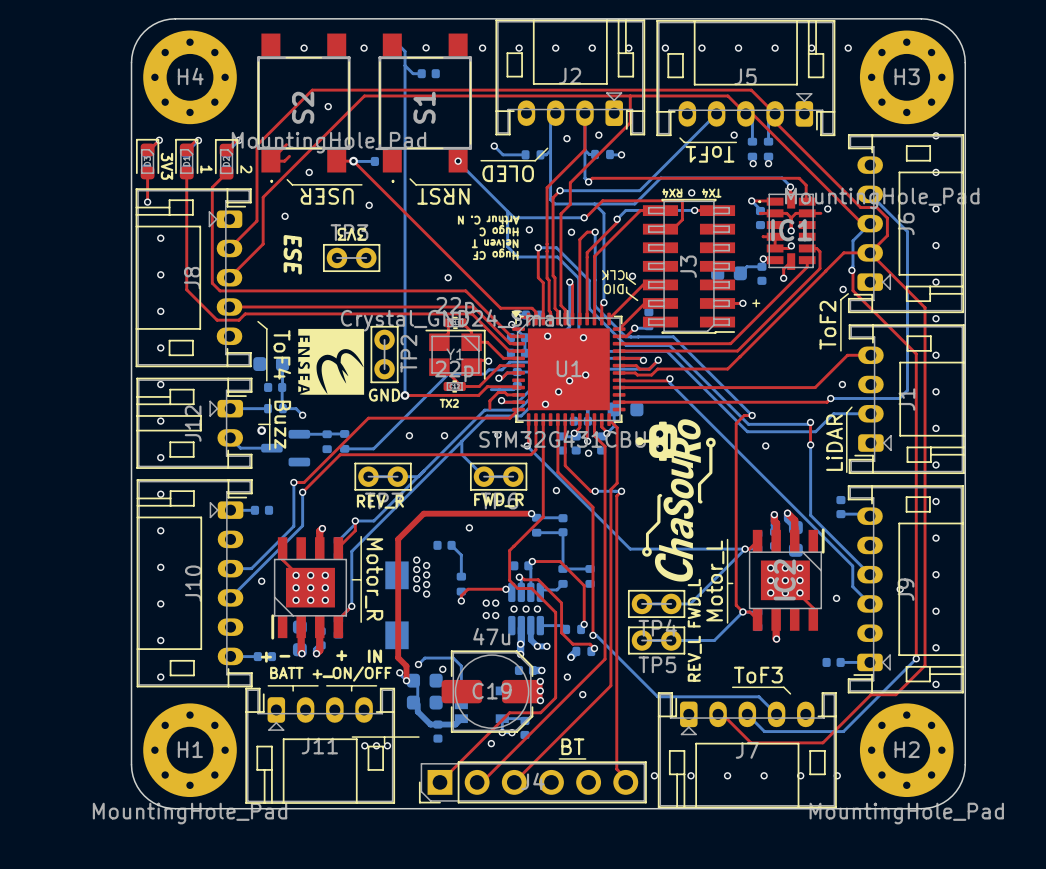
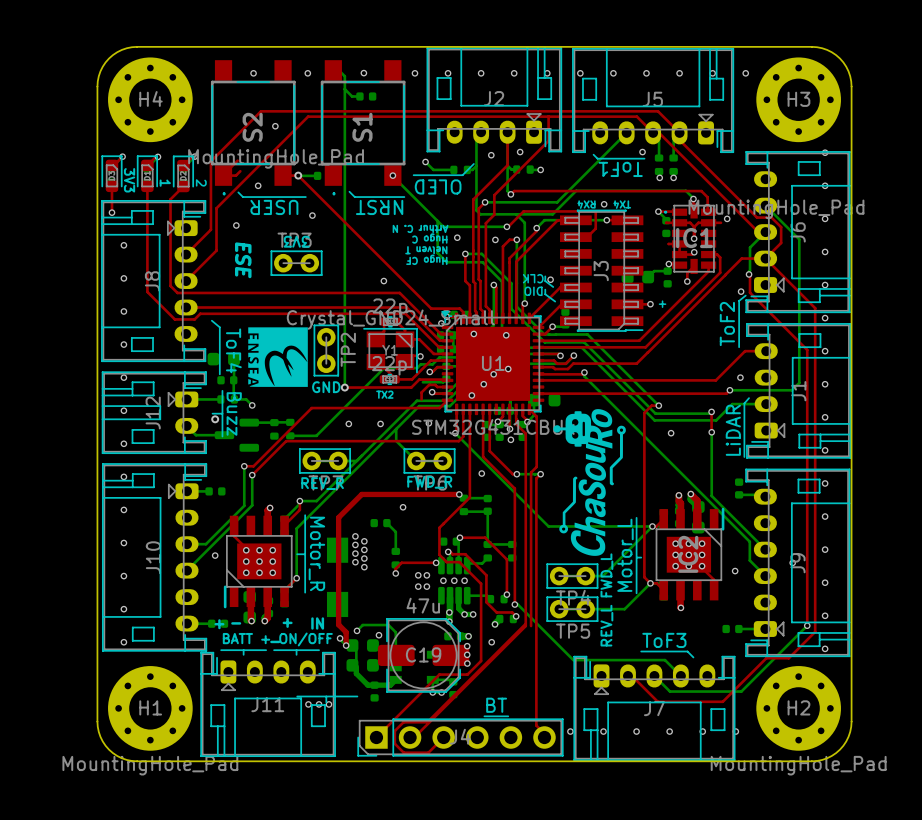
top track: (610, 659) (610, 685) (514, 782) -> (525, 623) (427, 722) (403, 722) (394, 730) (394, 743) (403, 752) (428, 752) (443, 737)
via: (582, 694) -> none
via: (491, 743) -> none

